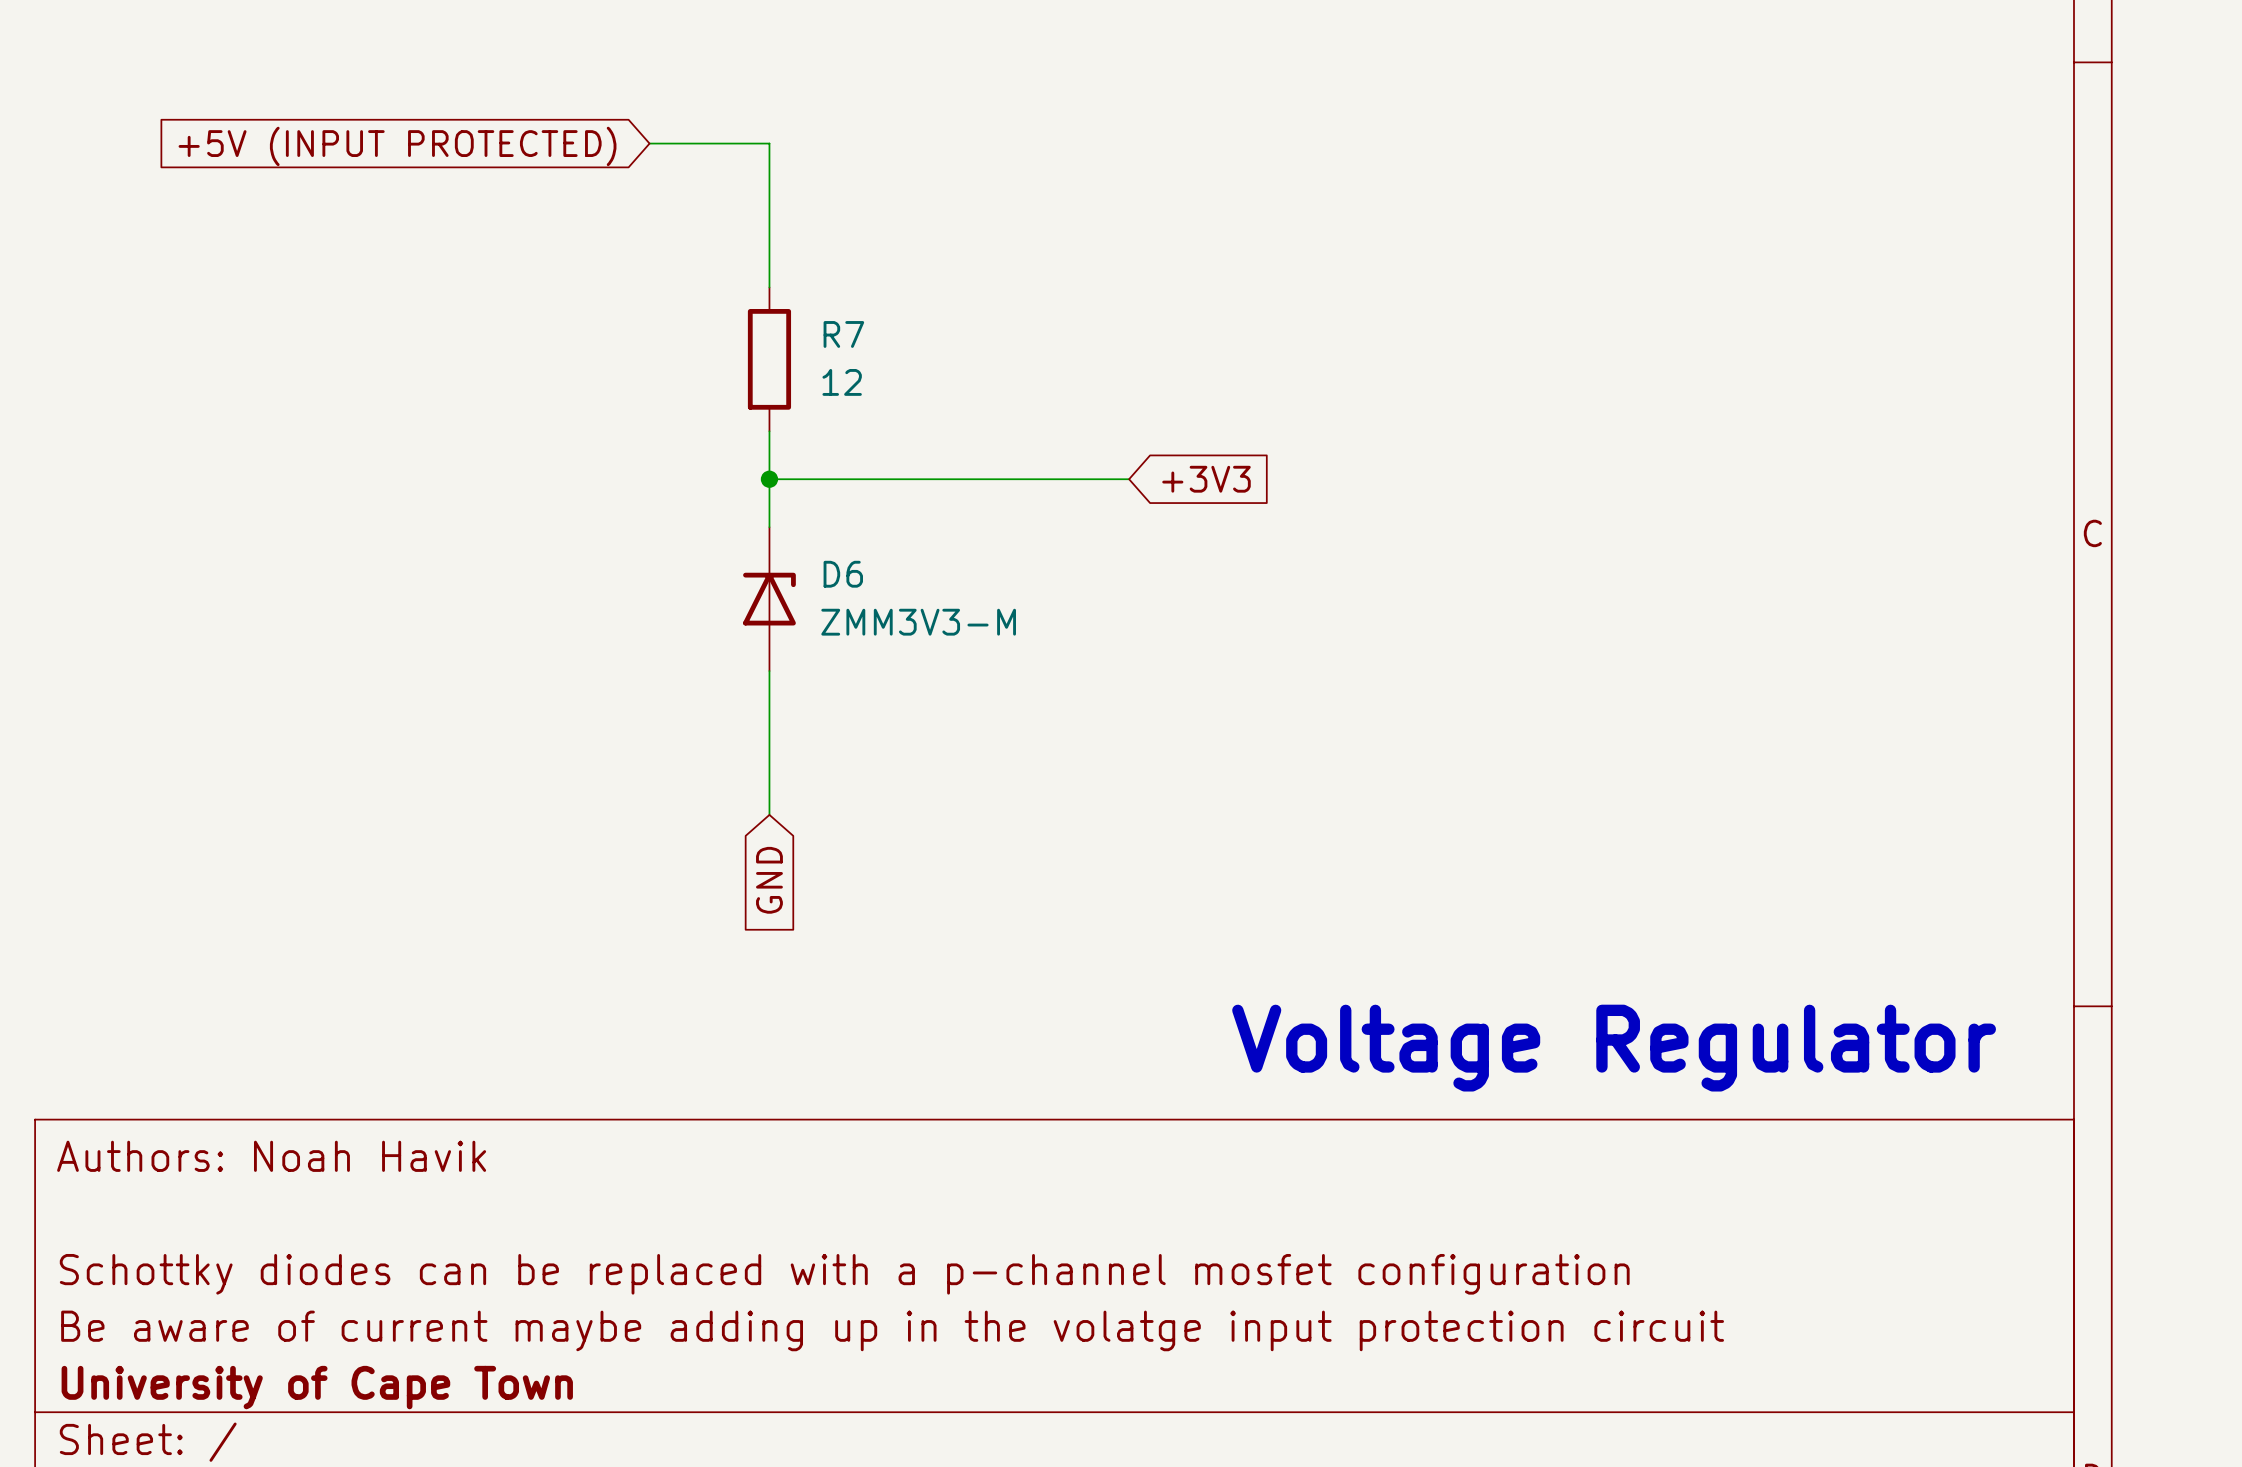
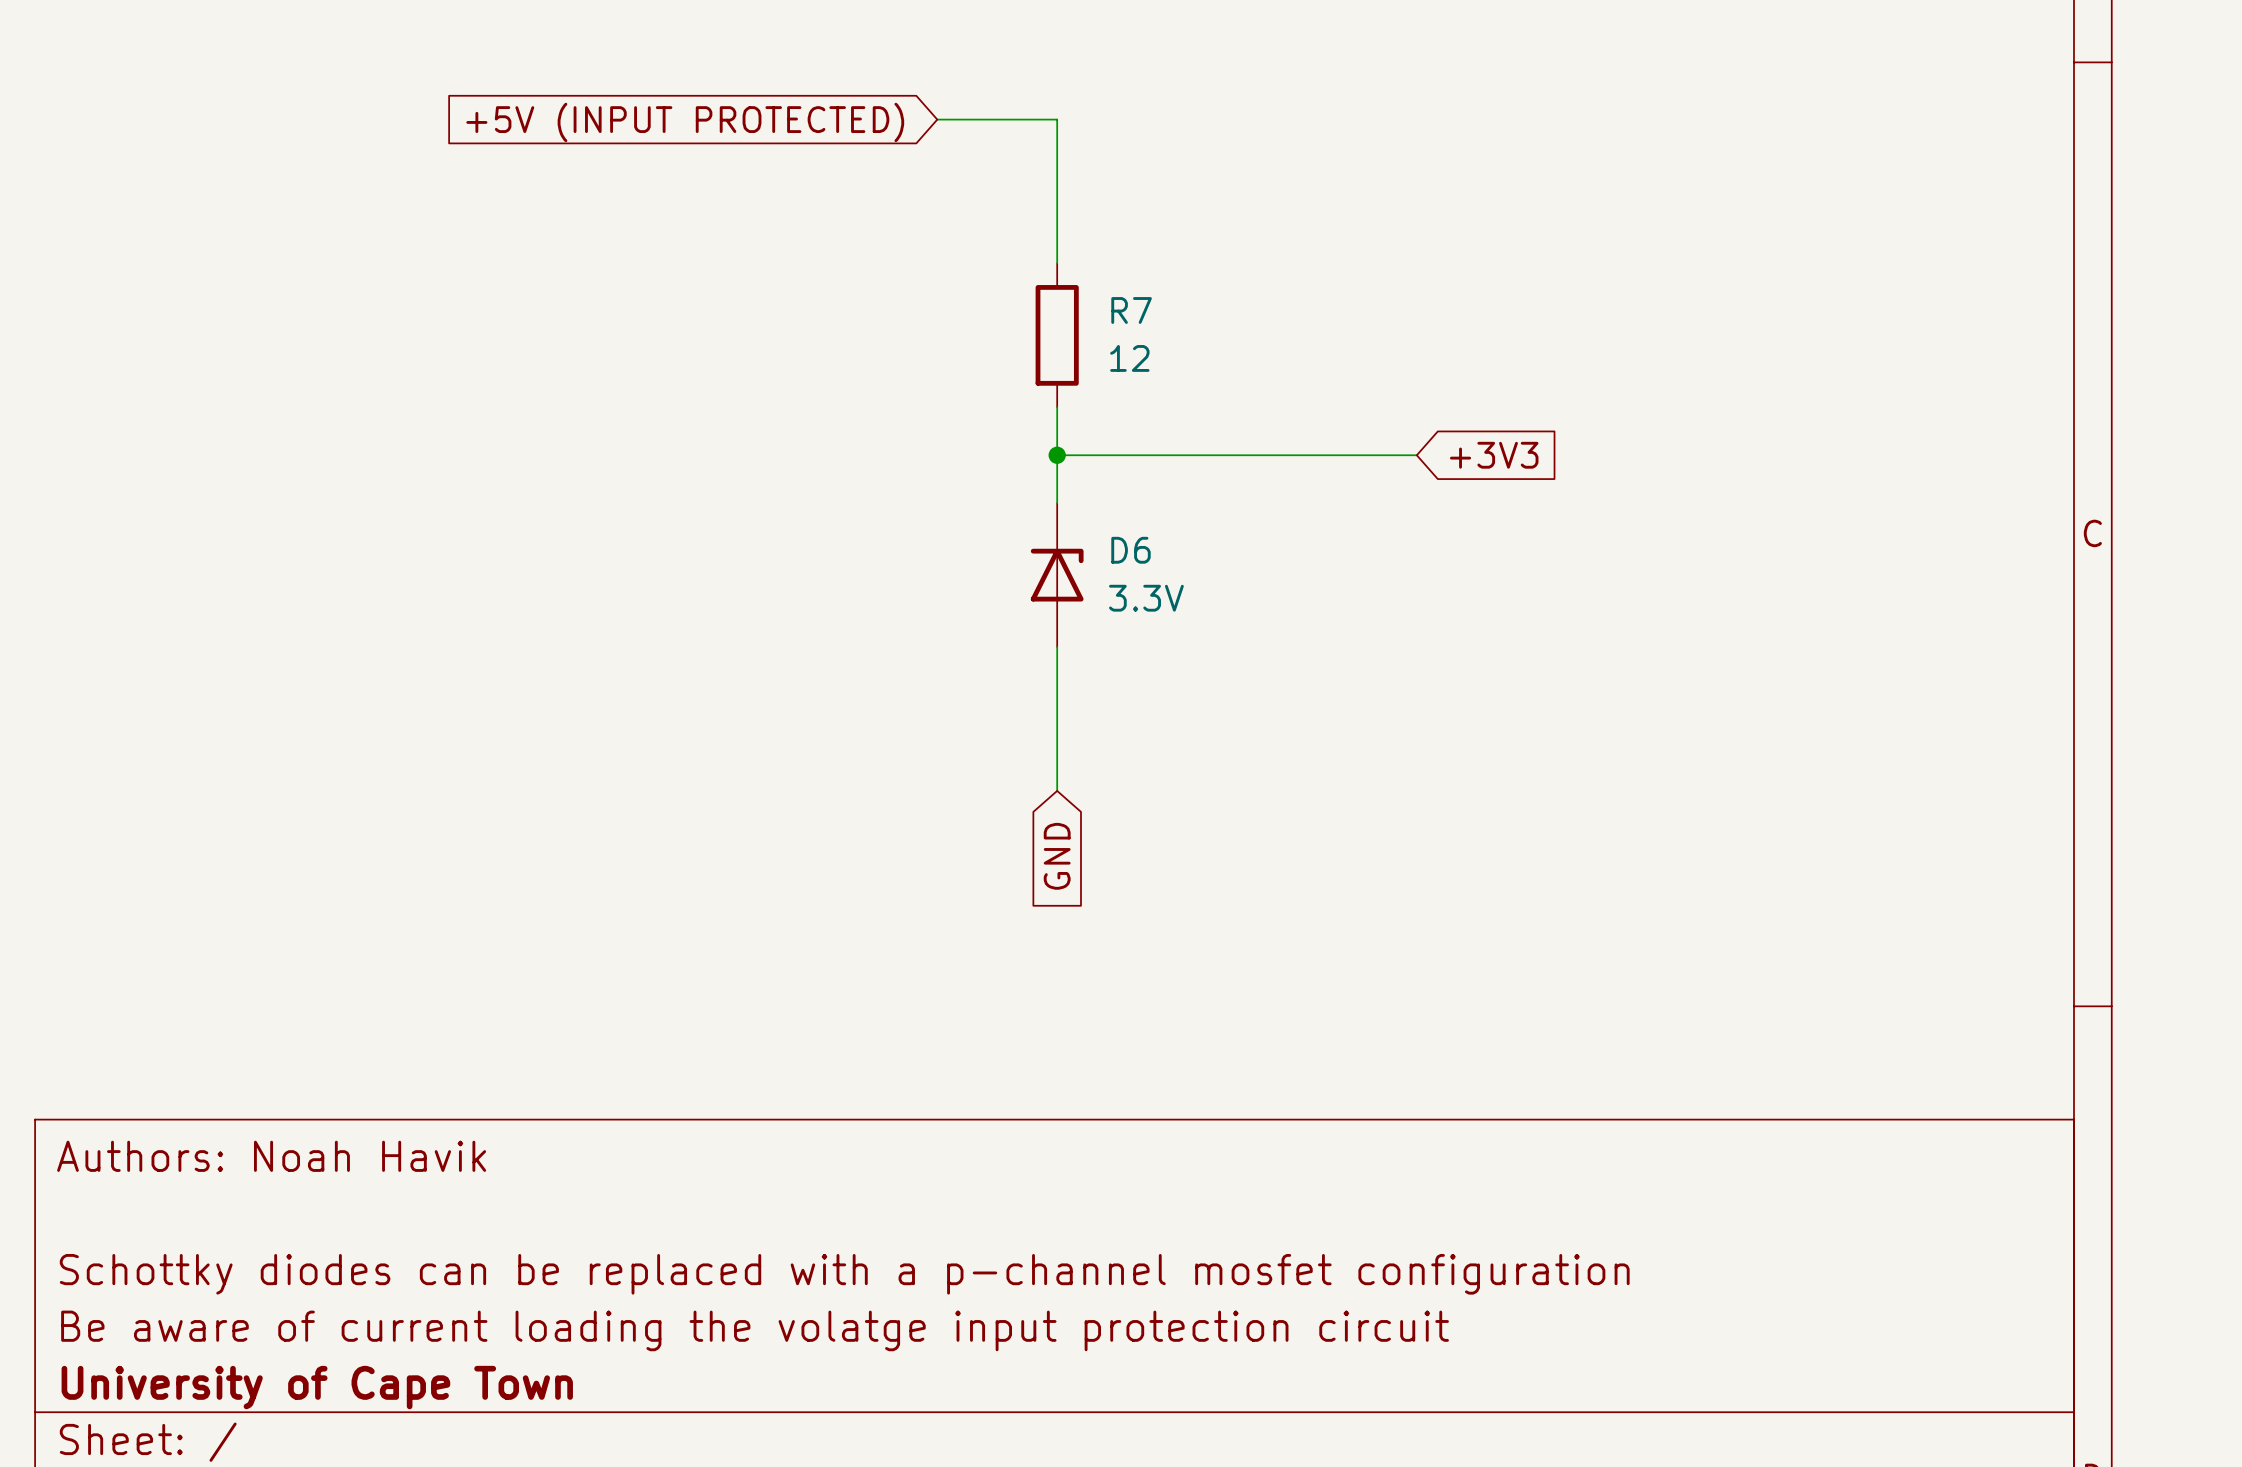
wire: (649, 143) (769, 143) (769, 287) -> (937, 119) (1057, 119) (1057, 263)
global label position: +5V (INPUT PROTECTED) (397, 146) -> +5V (INPUT PROTECTED) (685, 122)
R7 position: (769, 359) -> (1057, 335)
wire: (769, 431) (769, 527) -> (1057, 407) (1057, 503)
junction: none -> (1057, 455)
wire: (769, 479) (1129, 479) -> (1057, 455) (1416, 455)
junction: (769, 479) -> none
global label position: +3V3 (1206, 479) -> +3V3 (1494, 455)
D6 position: (769, 599) -> (1057, 575)
D6 value: ZMM3V3-M (918, 622) -> 3.3V (1146, 598)
wire: (769, 671) (769, 814) -> (1057, 647) (1057, 790)
global label position: GND (769, 880) -> GND (1057, 856)
text: Voltage Regulator (1614, 1048) -> none
title block: Be aware of current maybe adding up in the volatge input protection circuit (892, 1330) -> Be aware of current loading the volatge input protection circuit (755, 1330)

